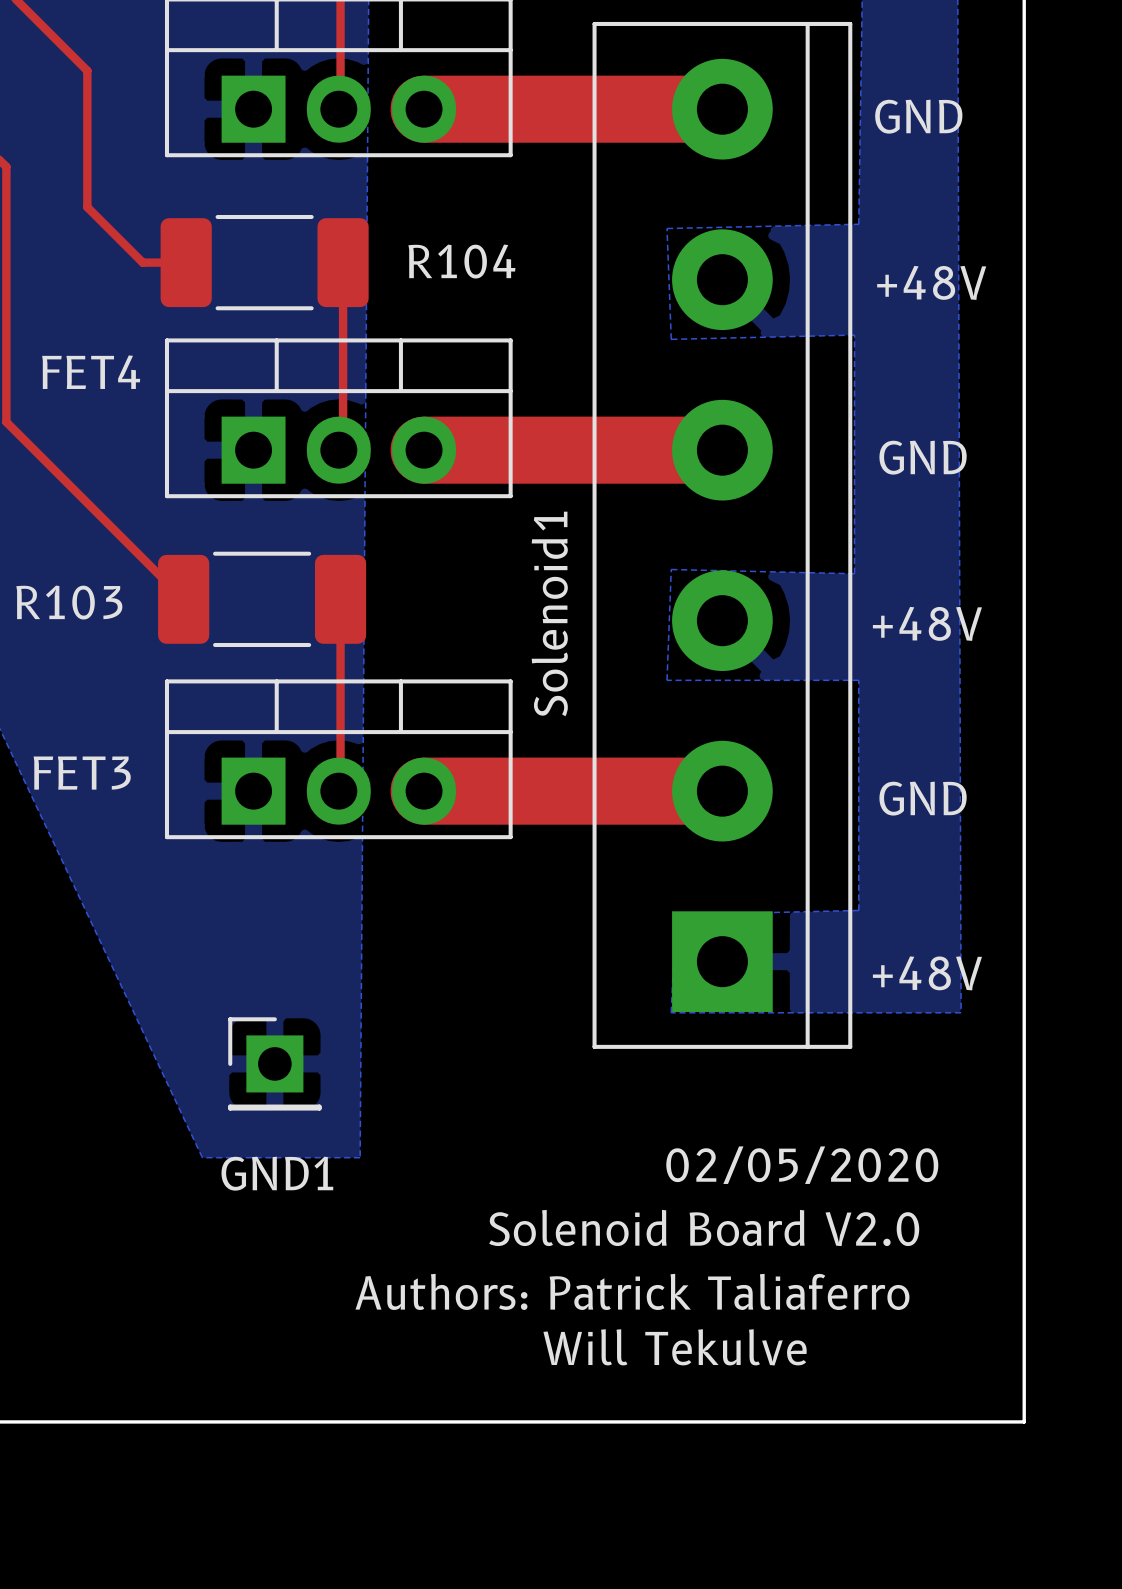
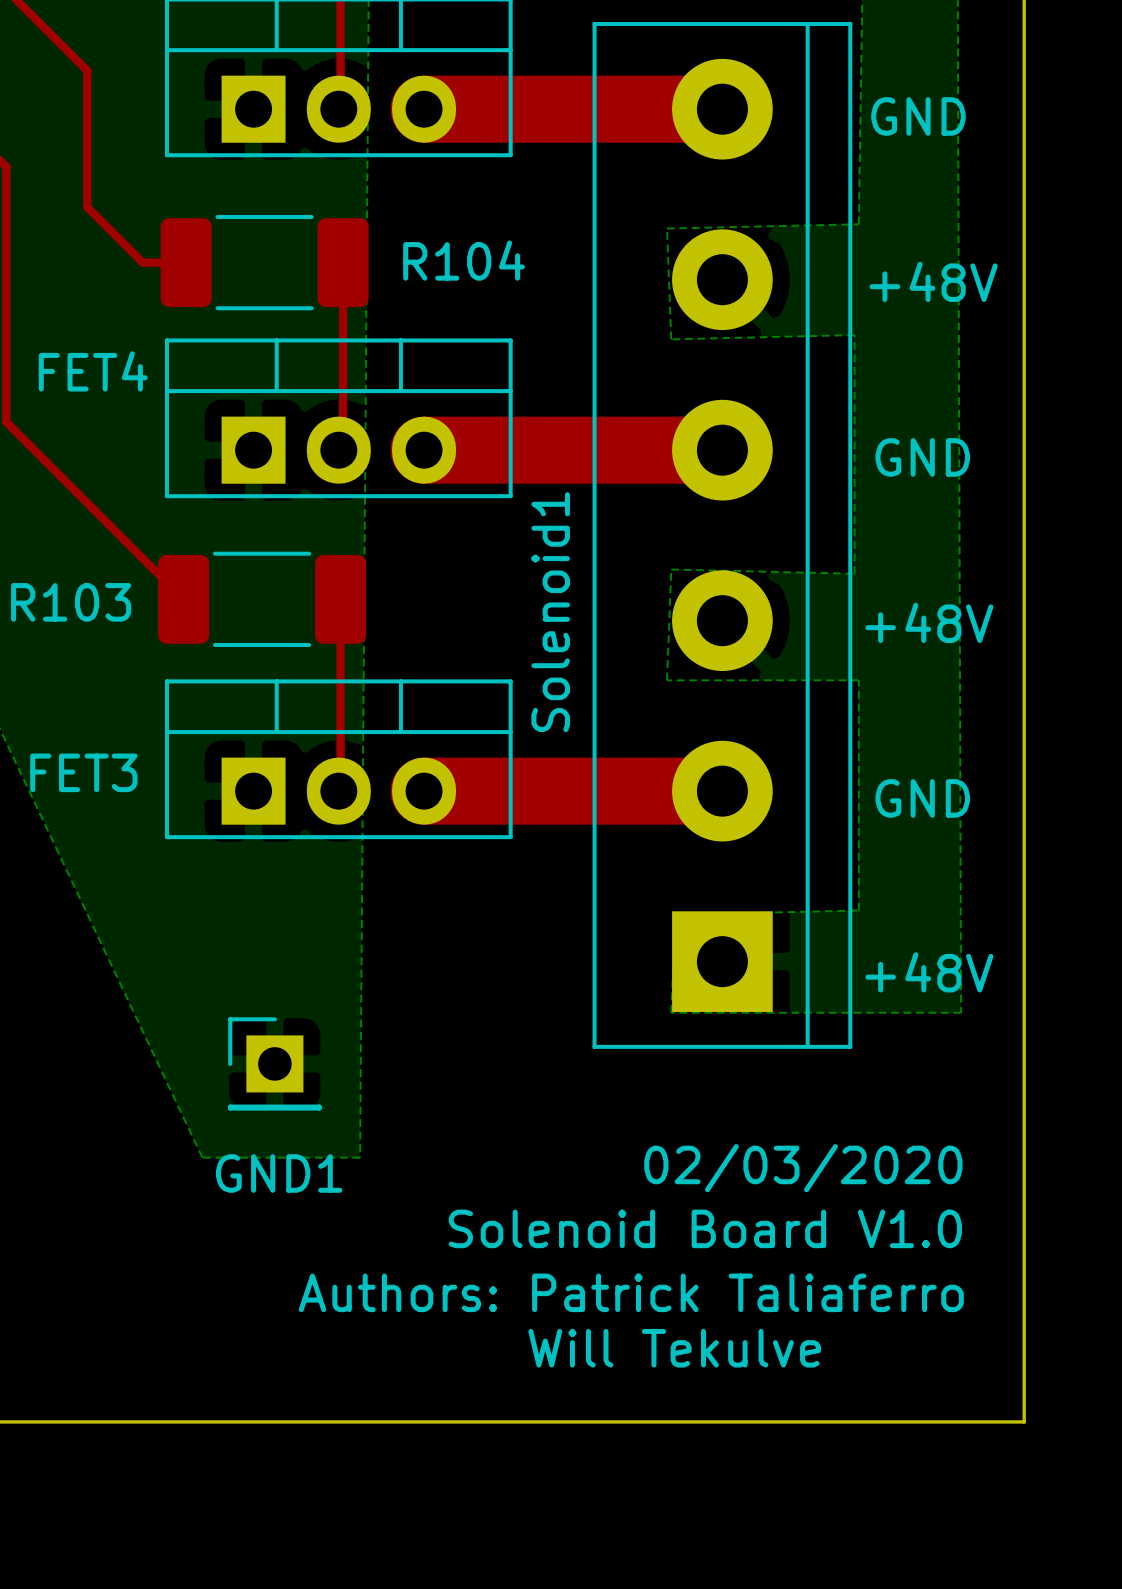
text: 02/05/2020 (802, 1165) -> 02/03/2020 (803, 1168)
text: Solenoid Board V2.0 (704, 1228) -> Solenoid Board V1.0 (705, 1228)

